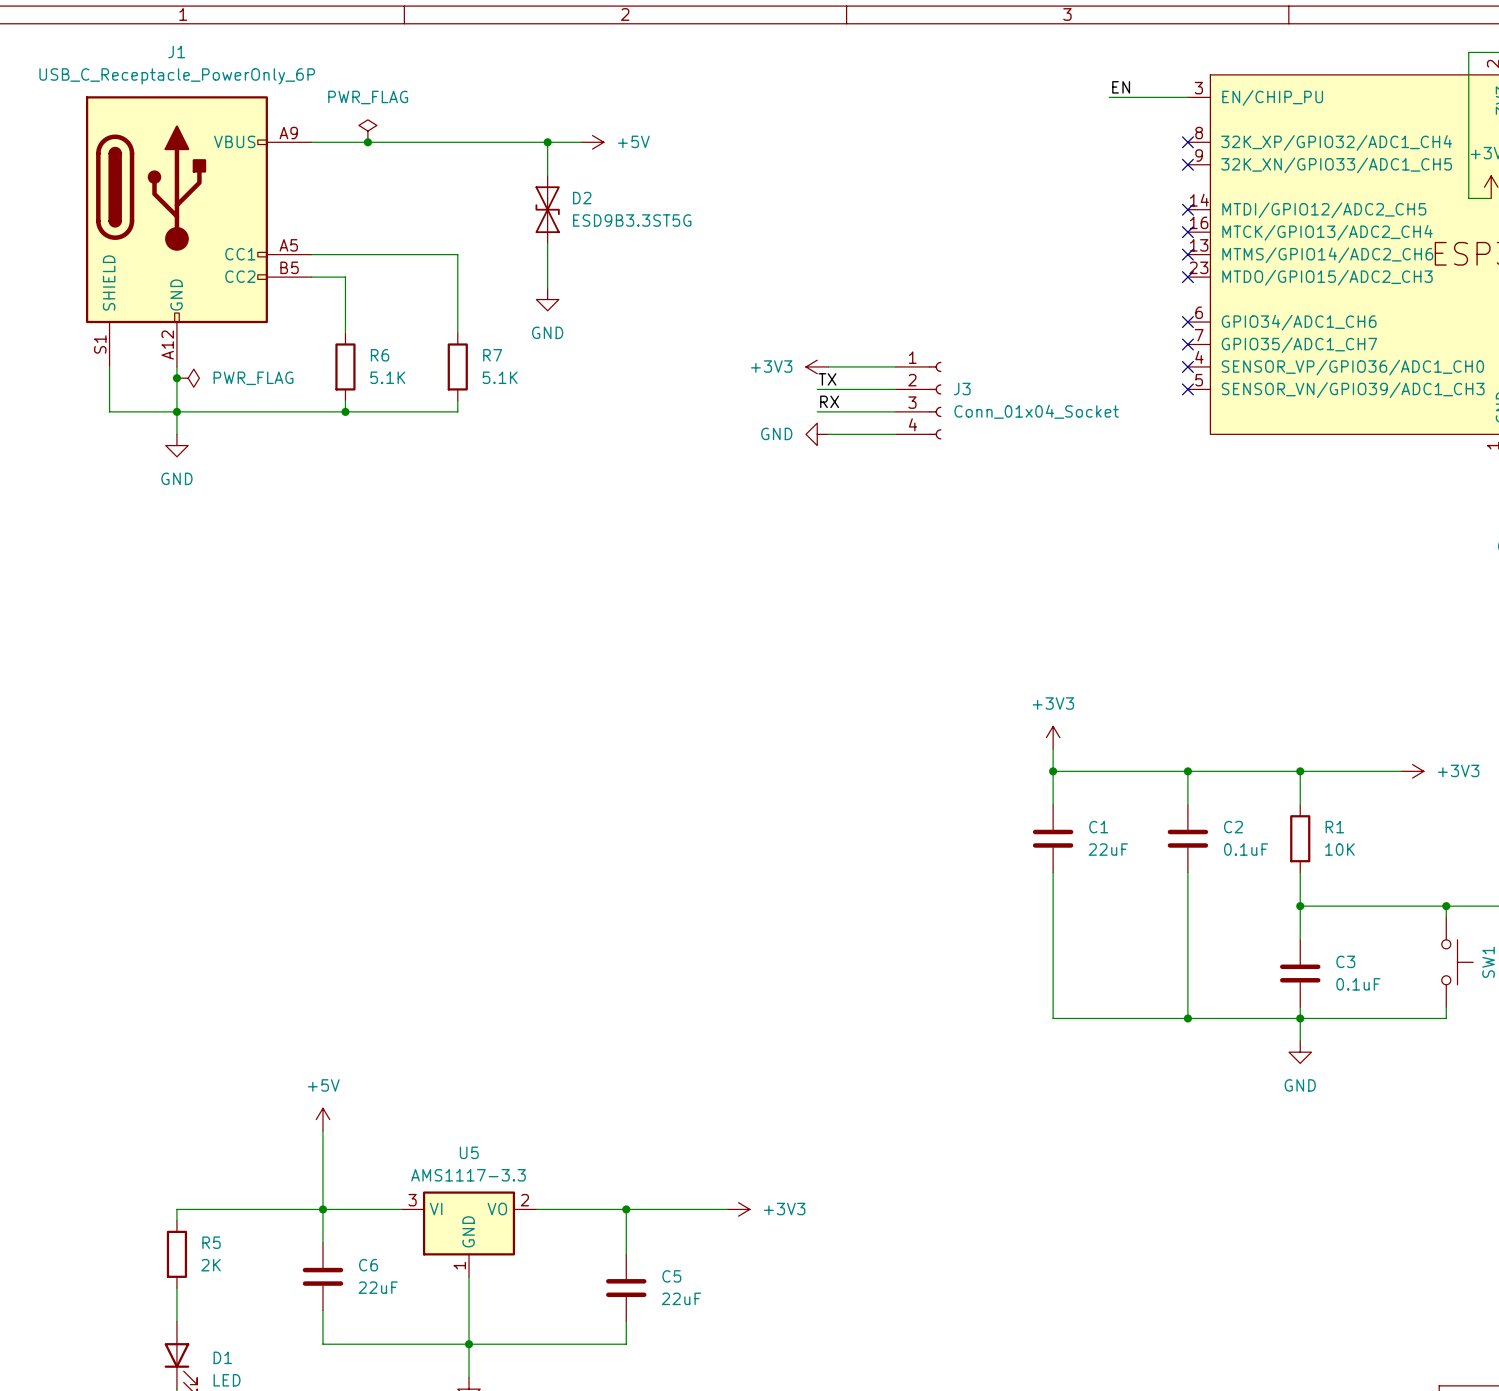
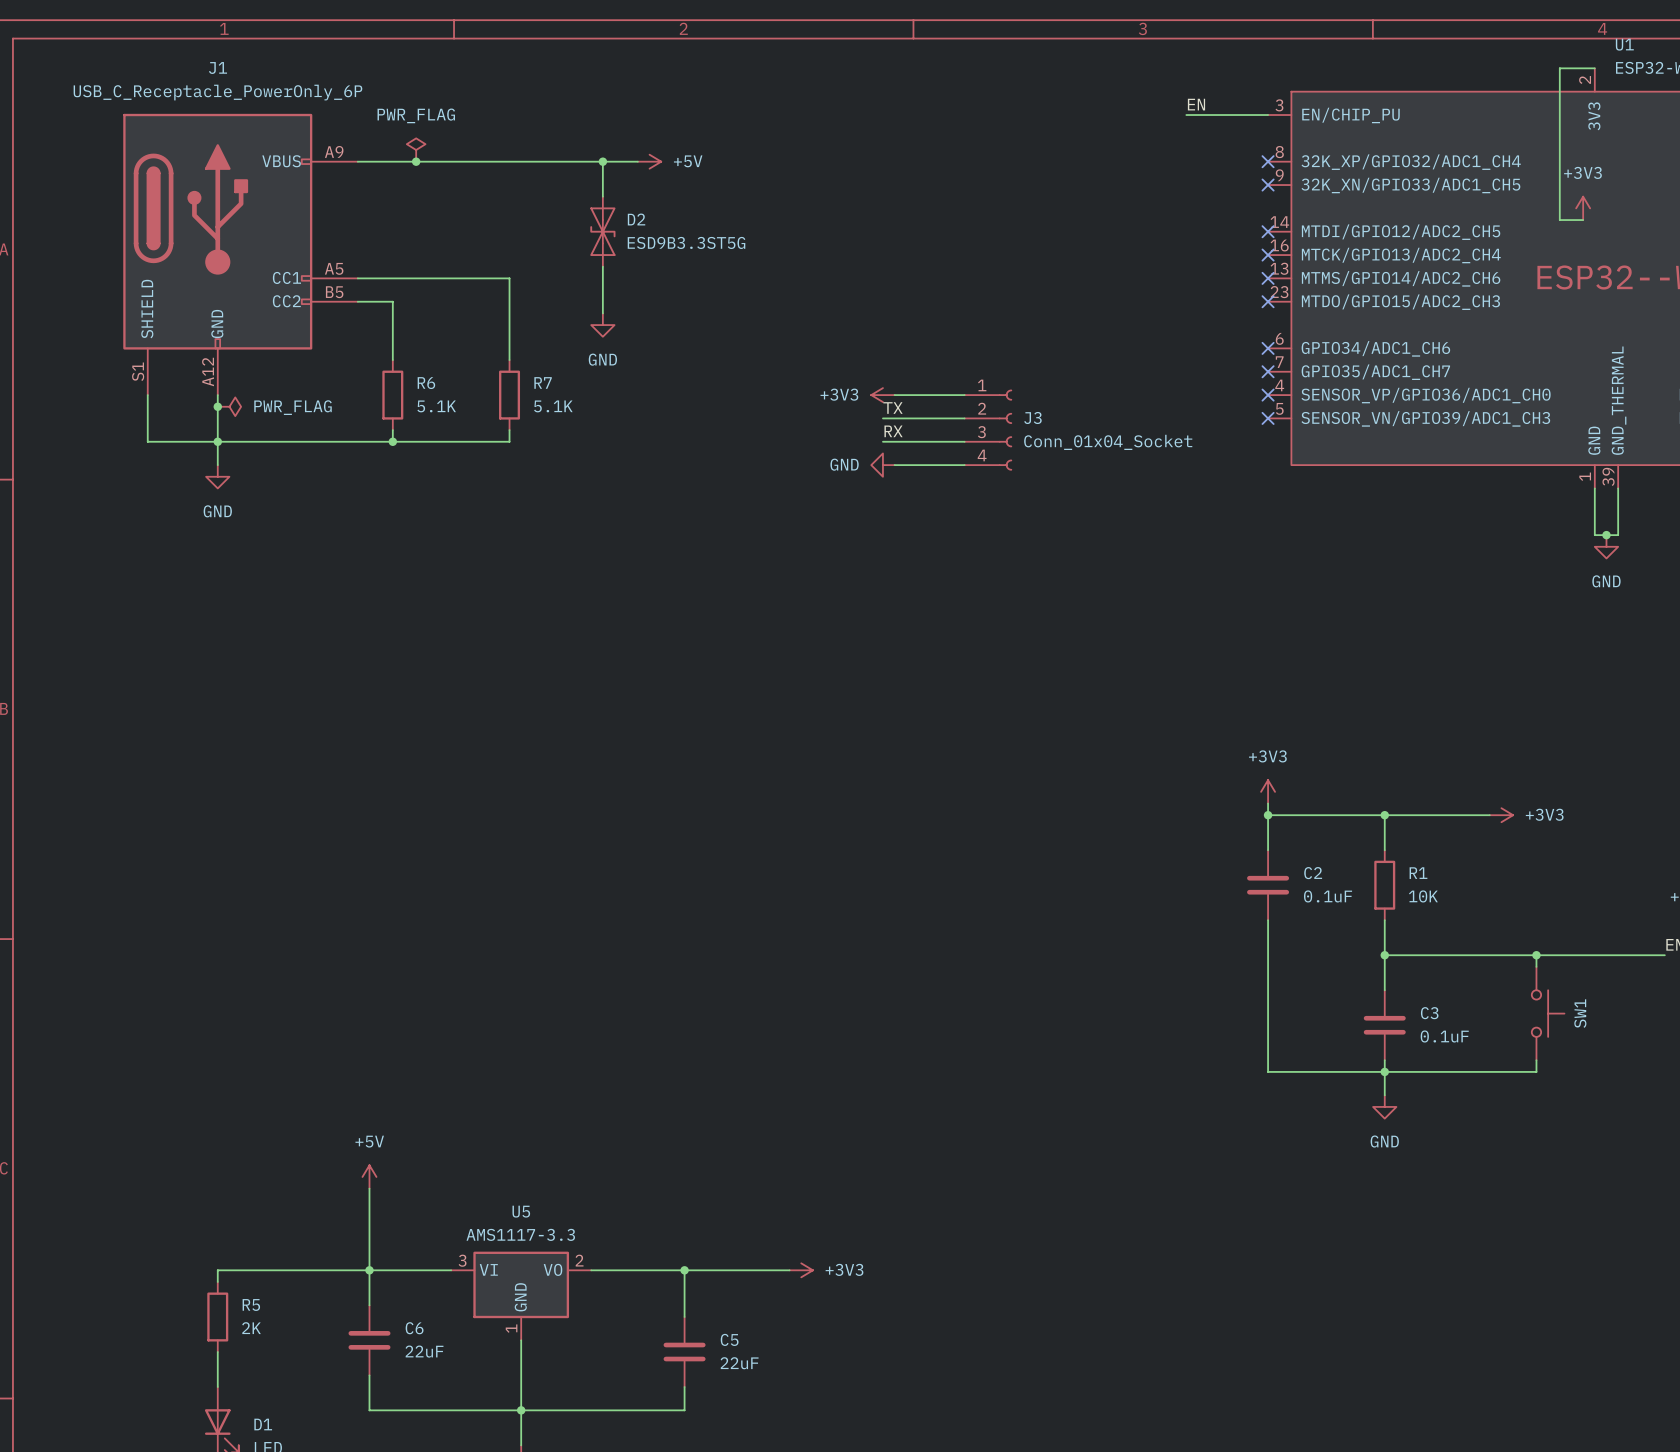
power symbol position: +3V3 (1053, 737) -> +3V3 (1268, 791)
wire: (1053, 748) (1053, 805) -> none
wire: (1053, 771) (1187, 771) -> (1268, 803) (1268, 815)
junction: (1053, 771) -> none
C1: 22uF (1053, 838) -> none
wire: (1053, 872) (1053, 1018) (1187, 1018) -> none
junction: (1187, 1018) -> none

